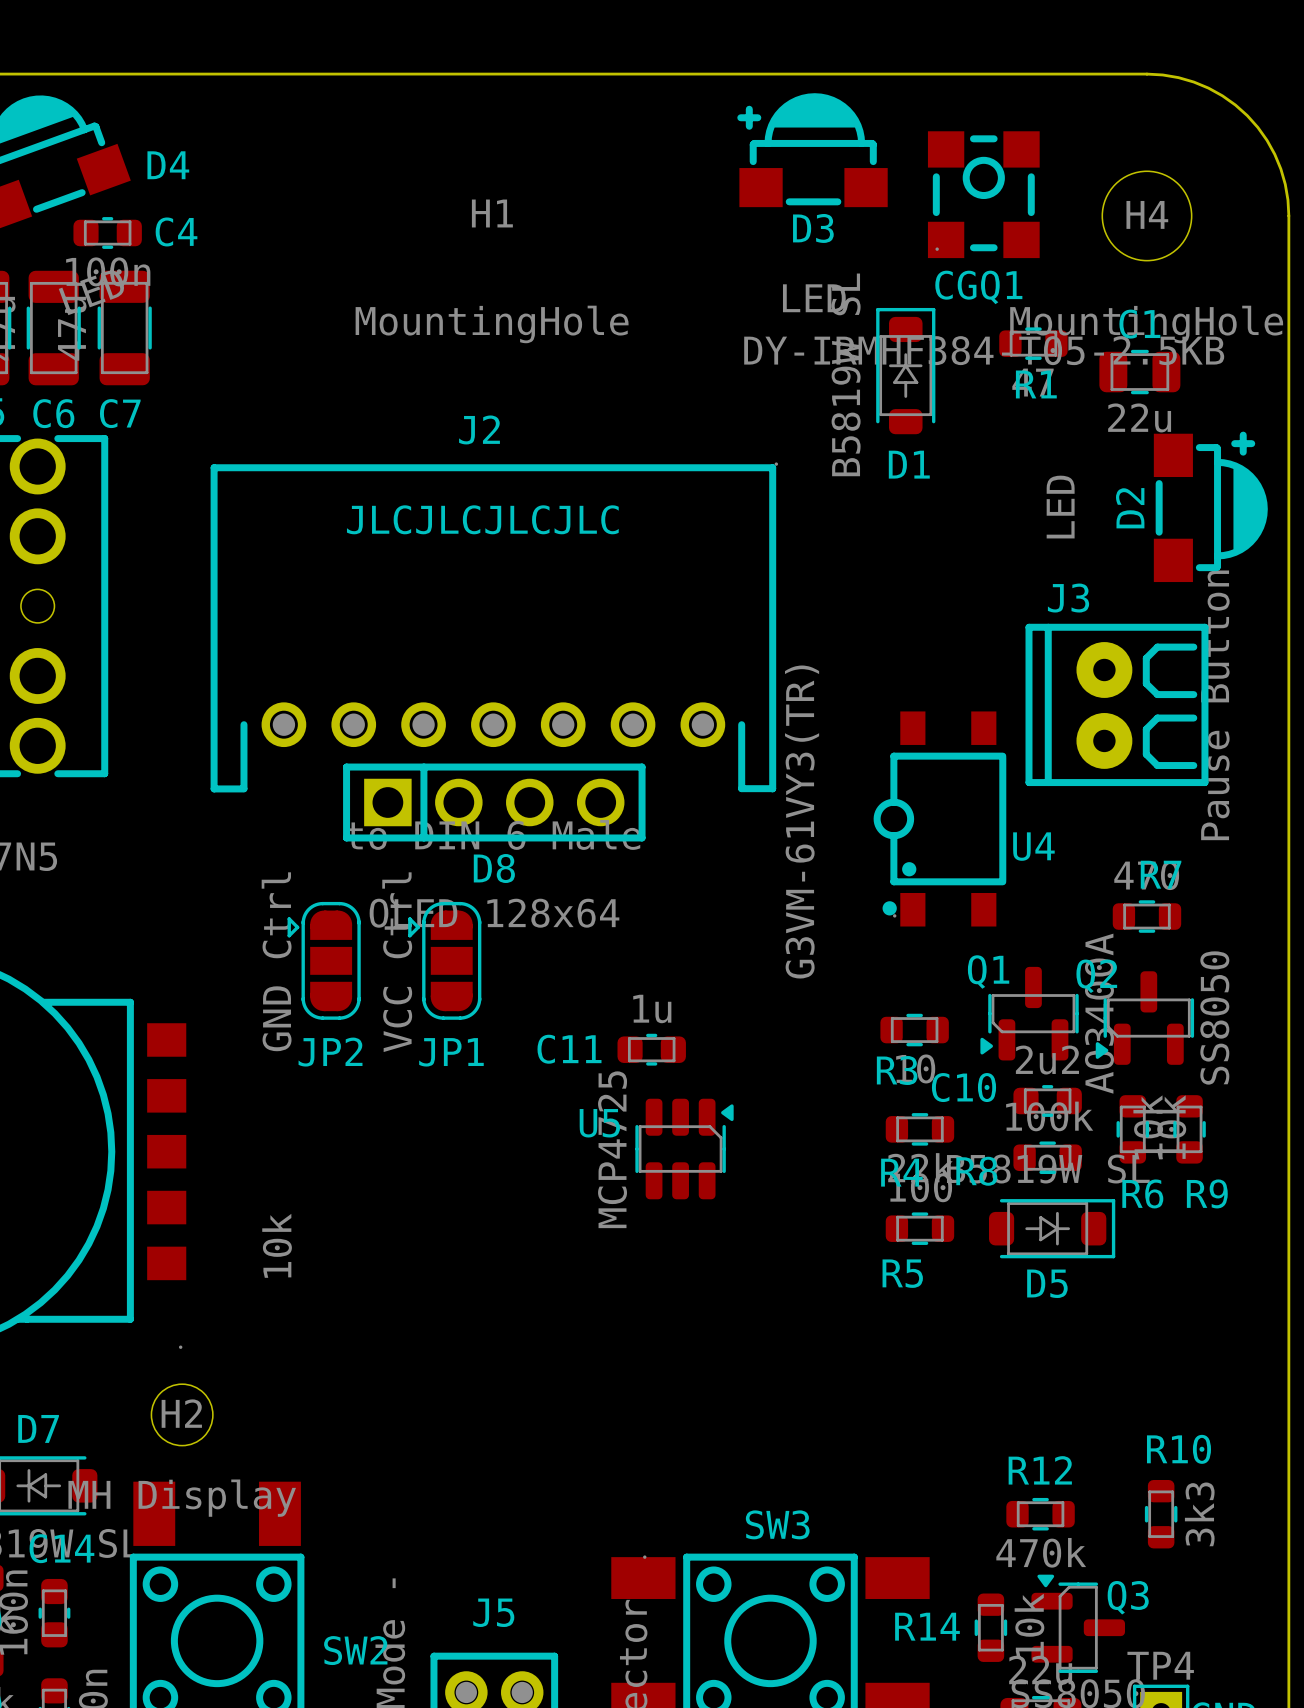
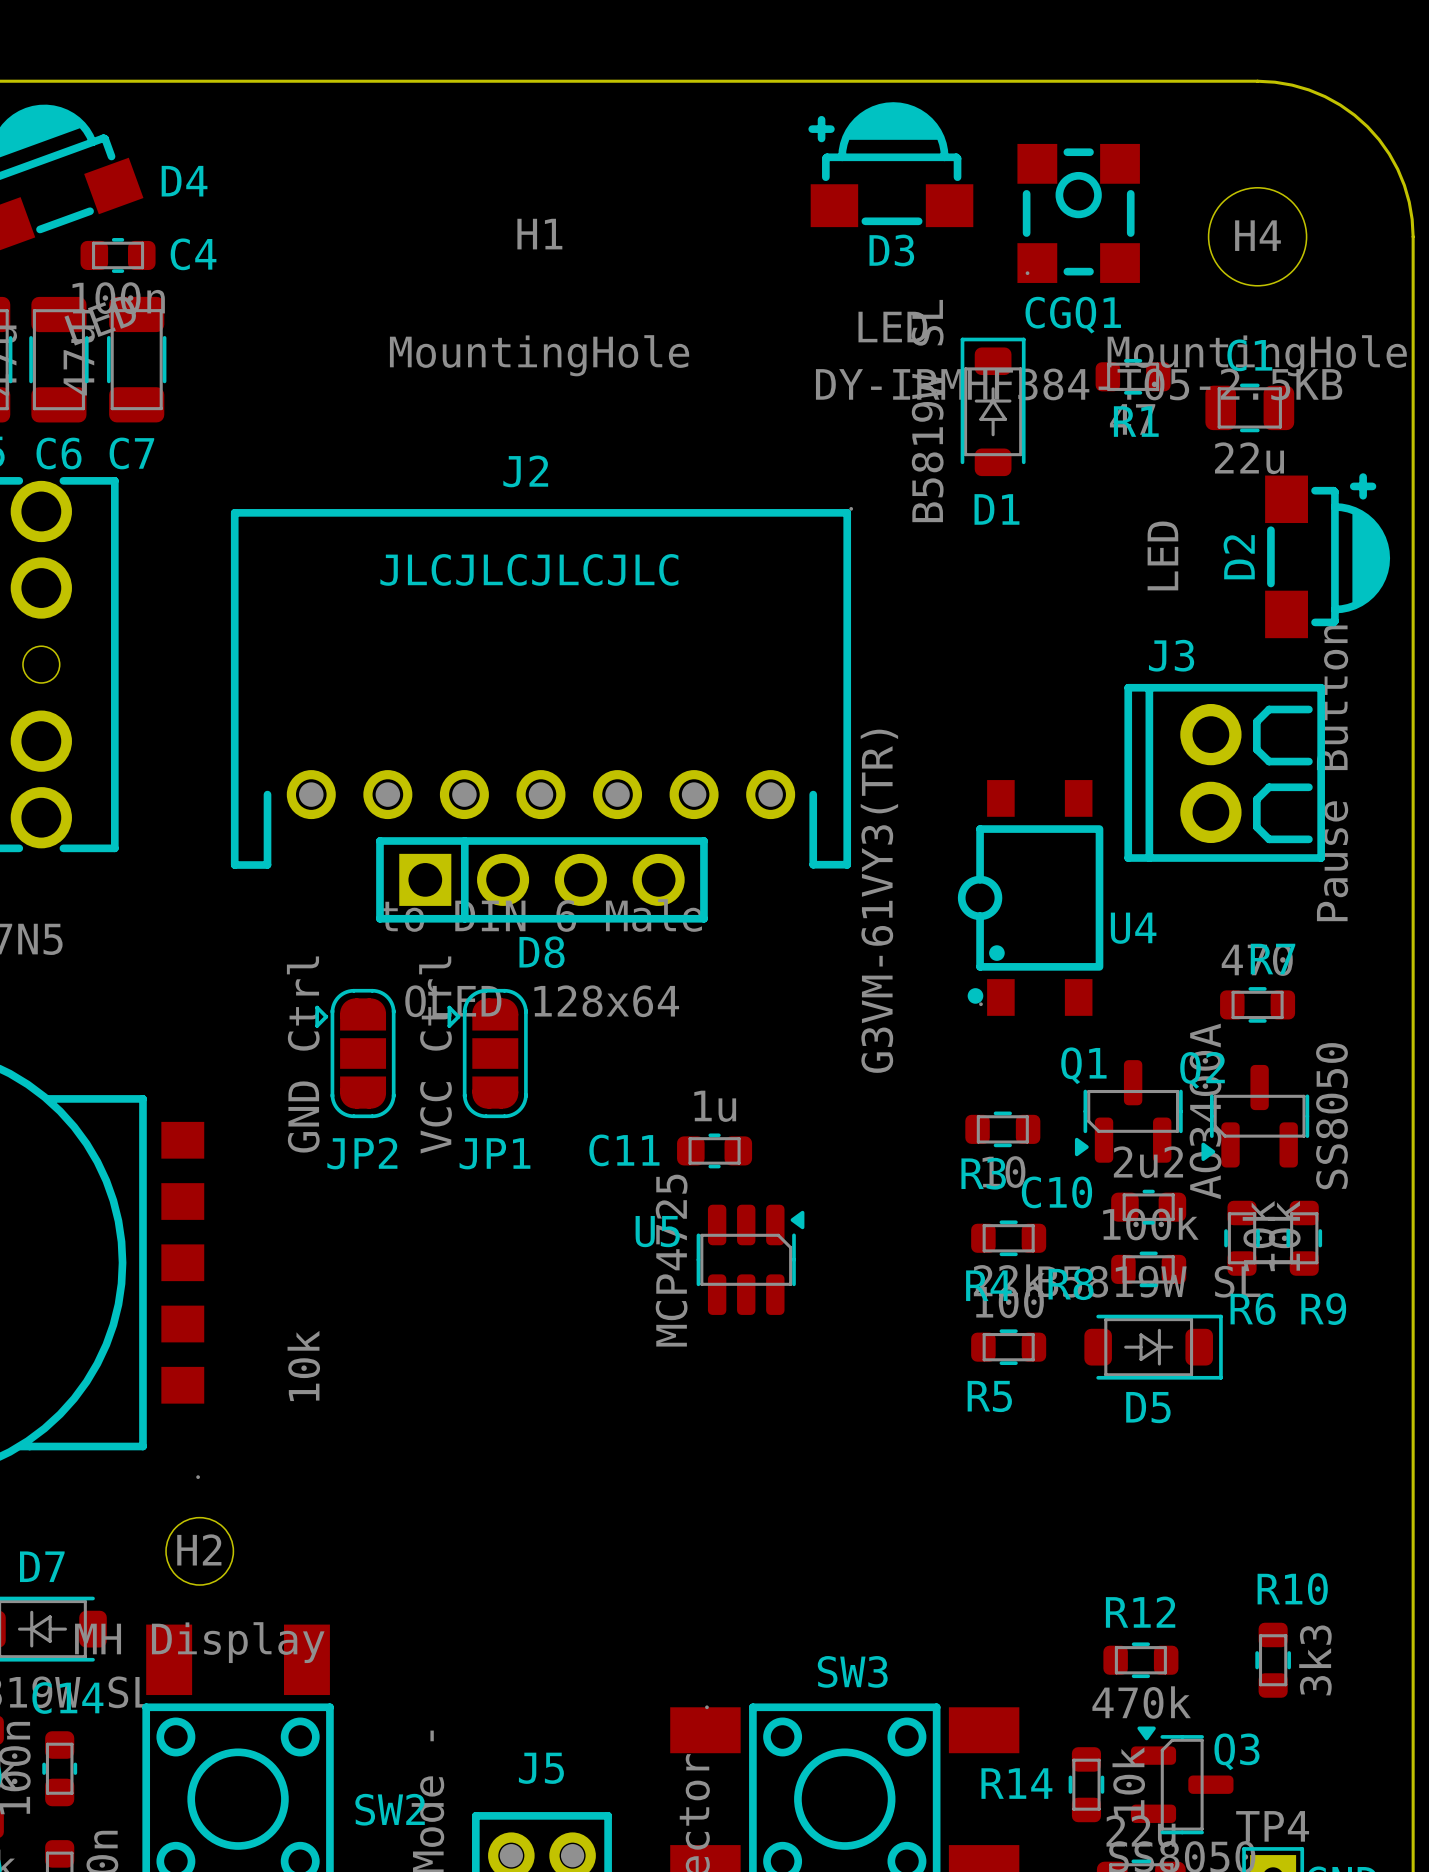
J3 footprint: [1025, 623, 1209, 787] -> [1124, 683, 1325, 862]

